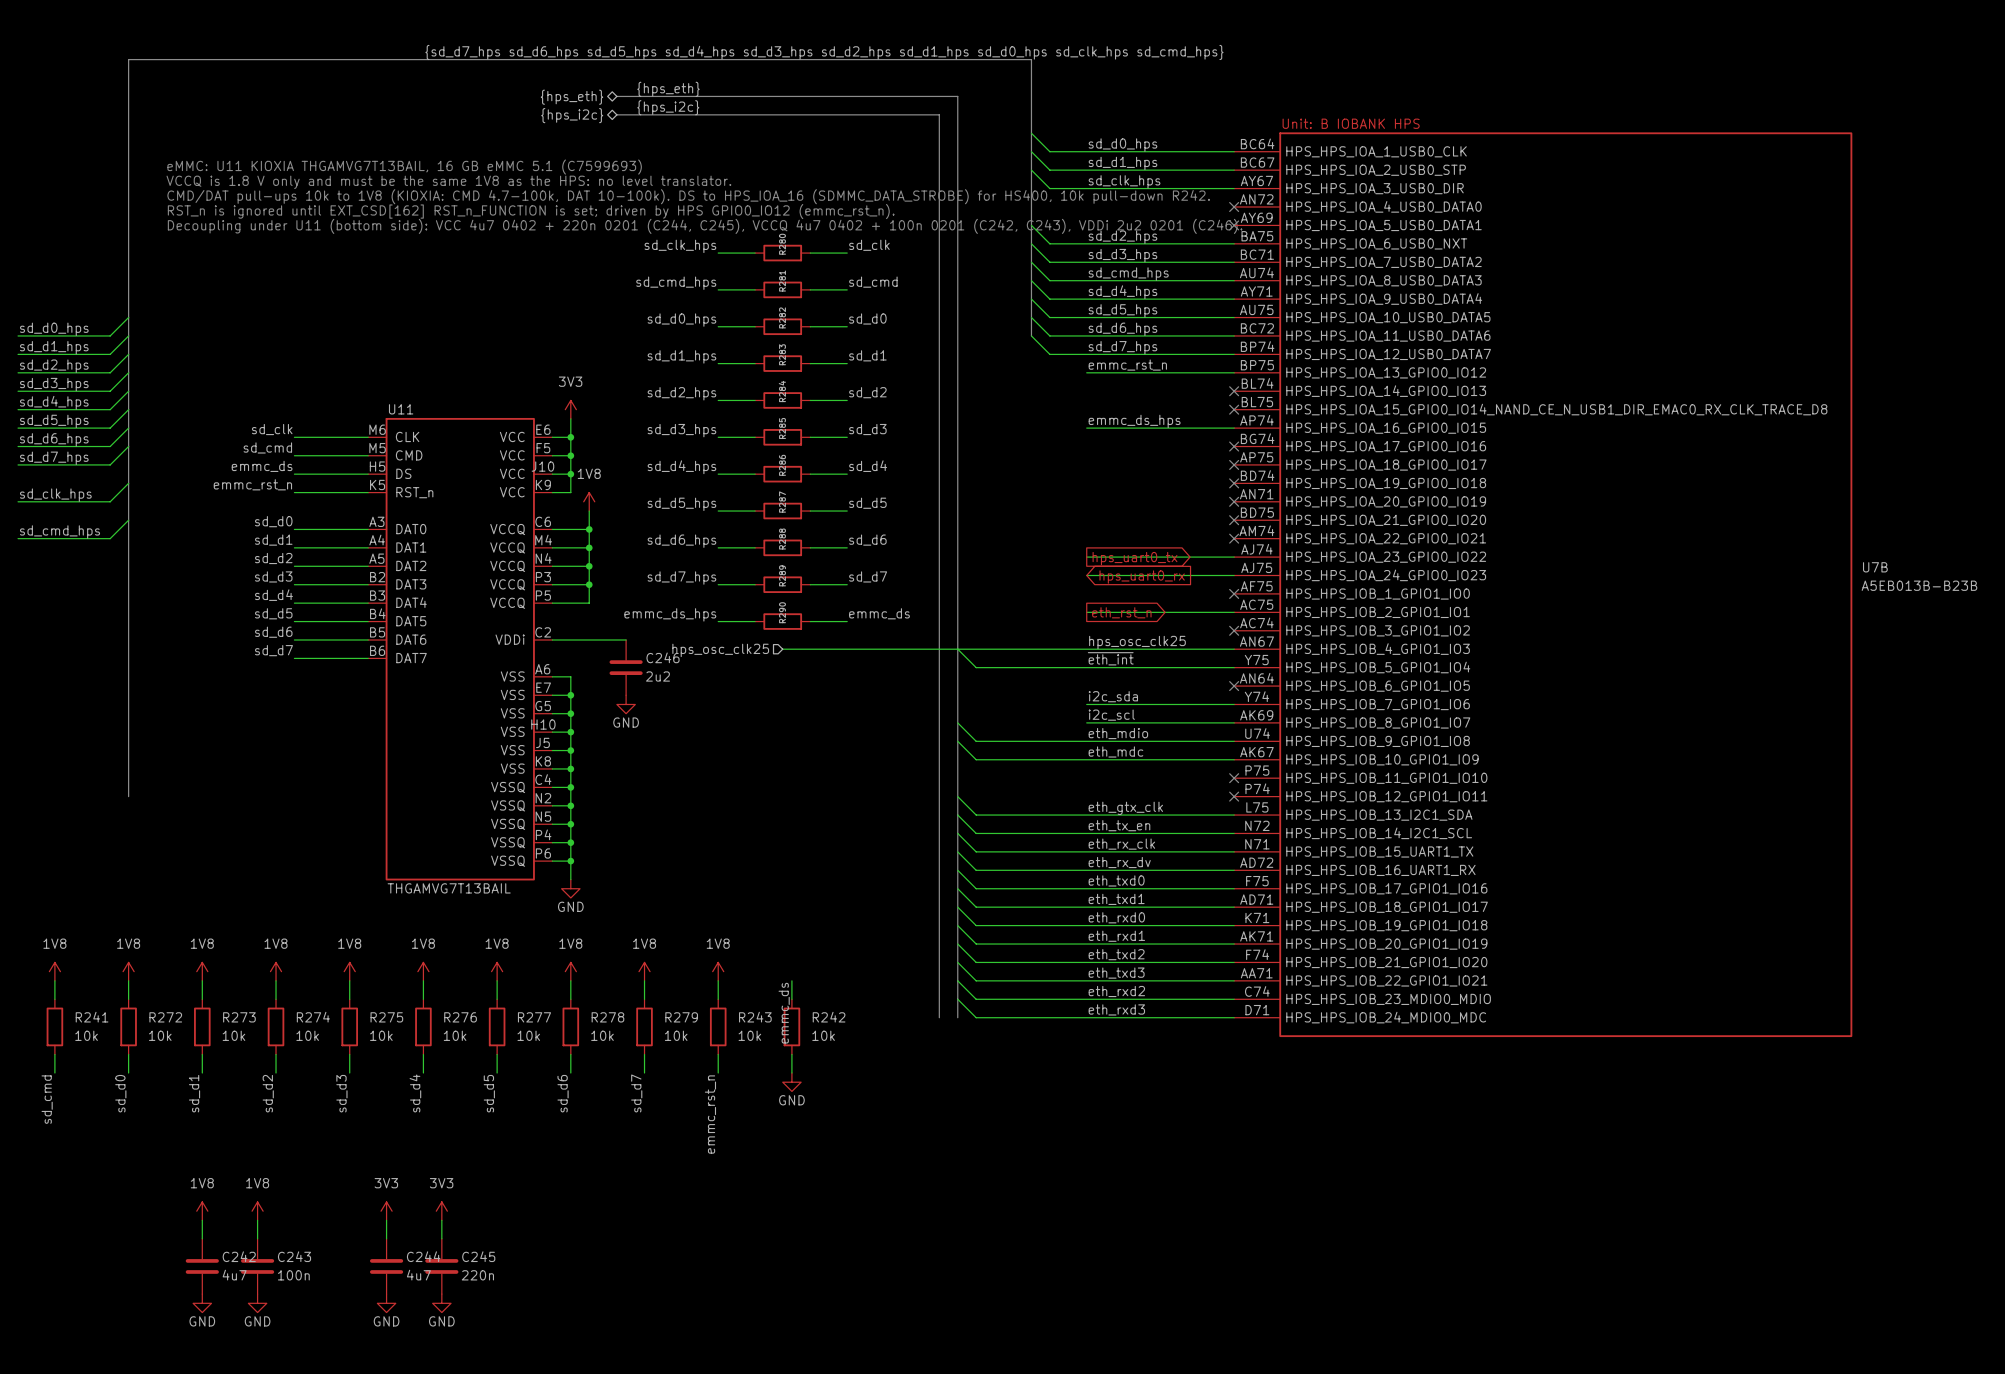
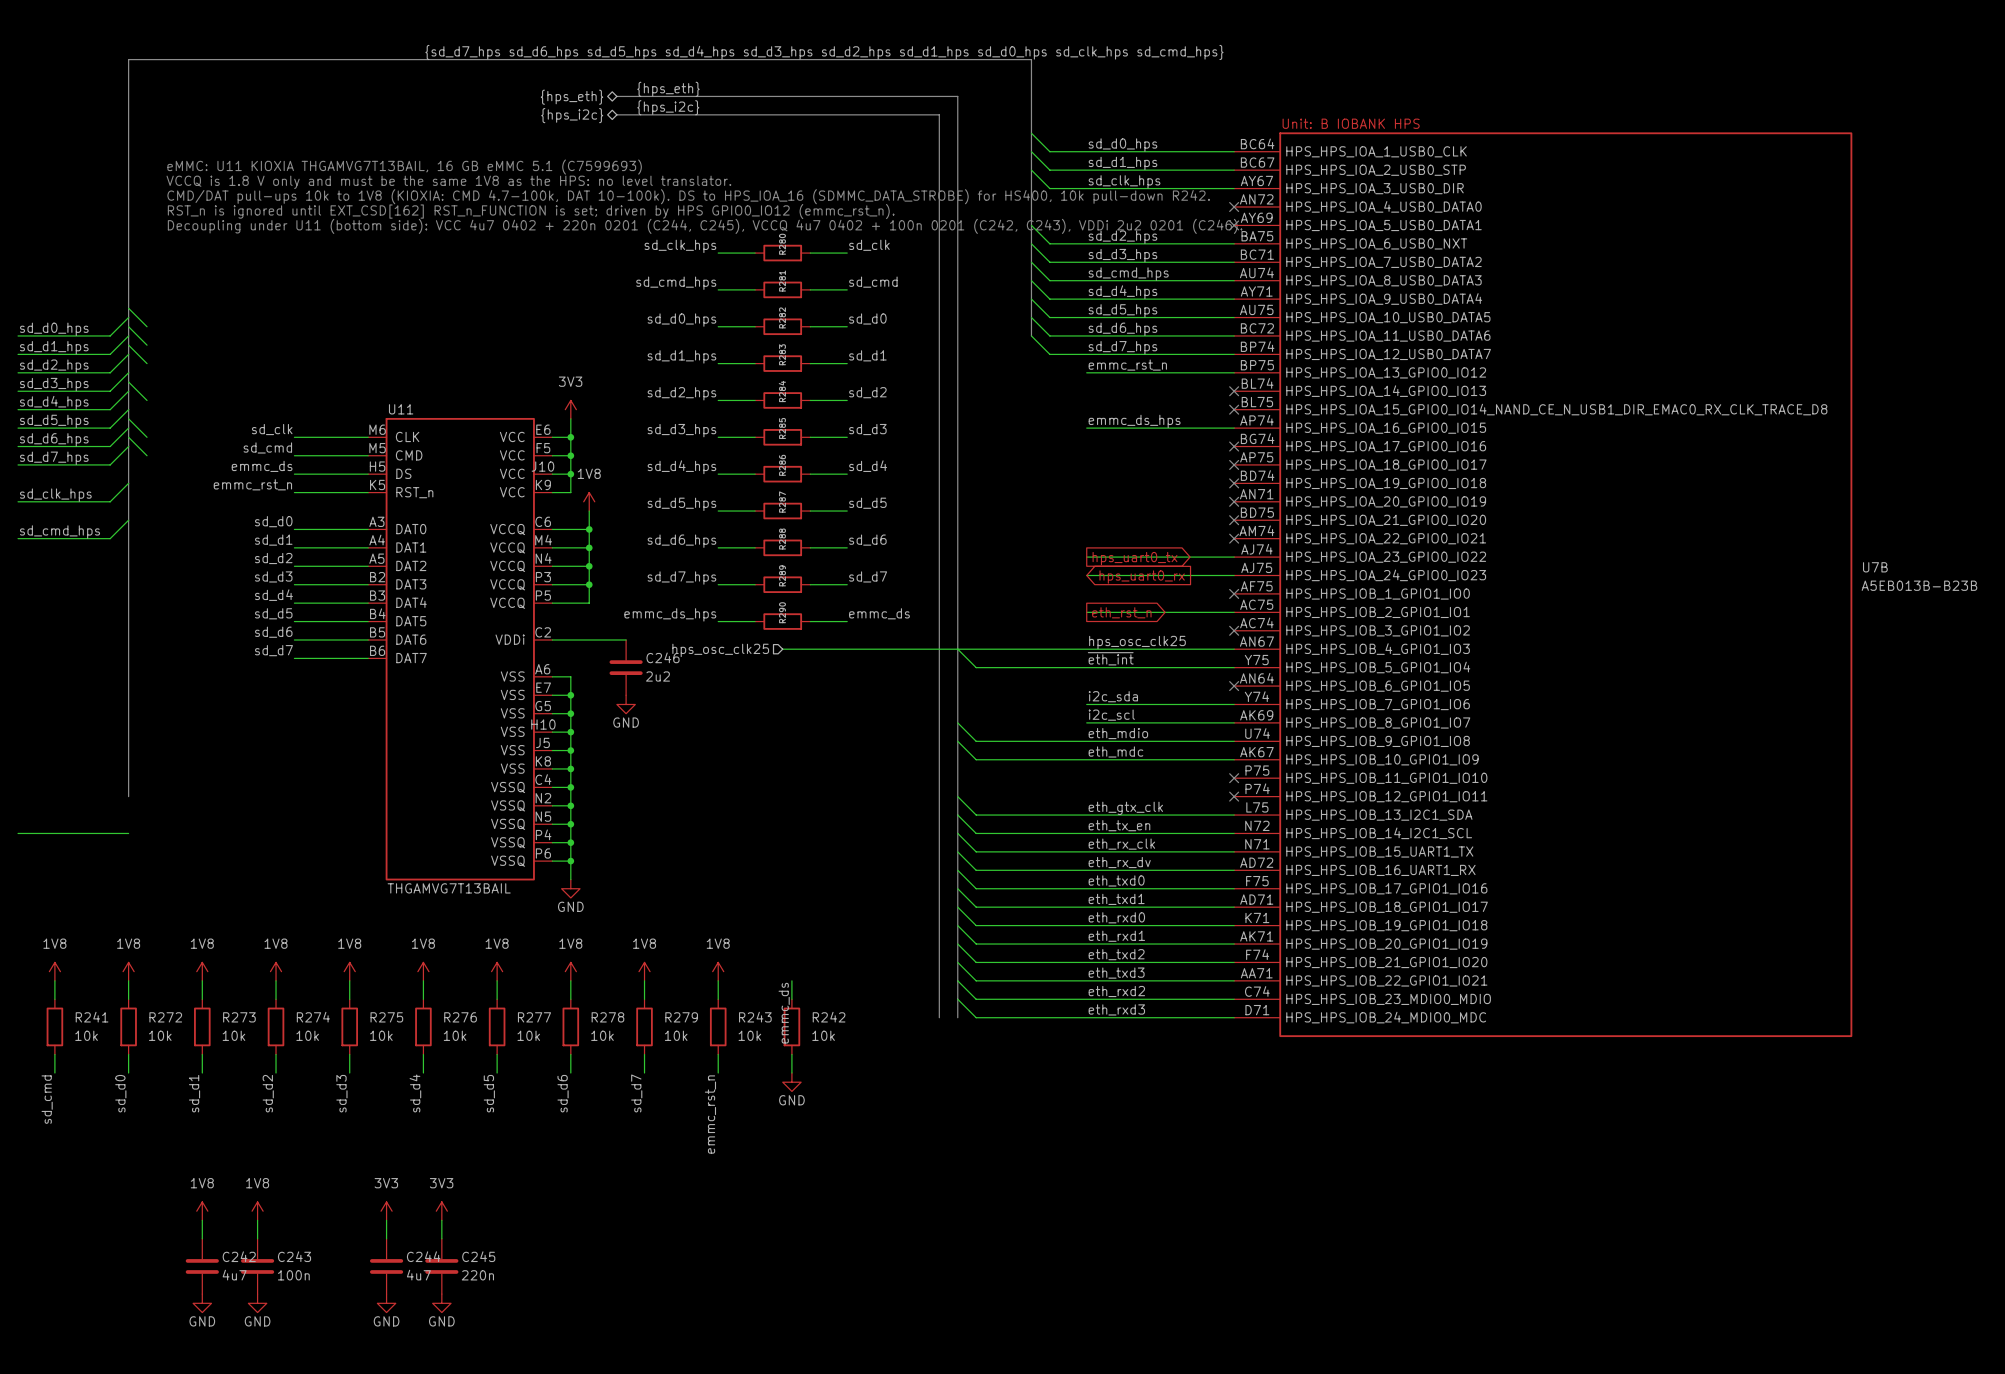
wire: none -> (128, 308) (147, 326)
wire: none -> (128, 326) (147, 345)
wire: none -> (128, 345) (147, 363)
wire: none -> (128, 382) (147, 400)
wire: none -> (128, 418) (147, 437)
wire: none -> (128, 437) (147, 455)
wire: none -> (18, 833) (128, 833)

